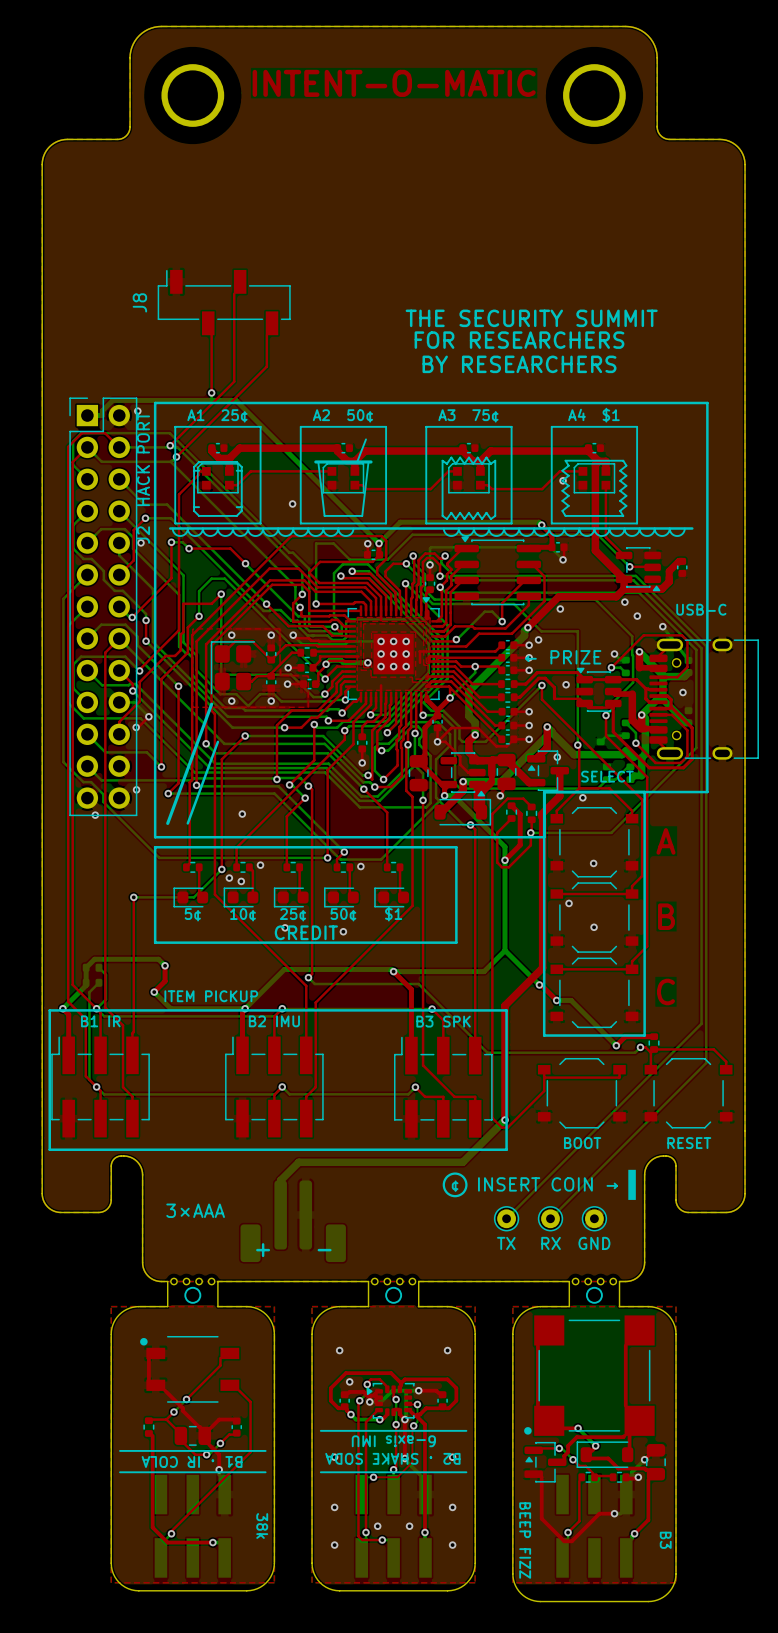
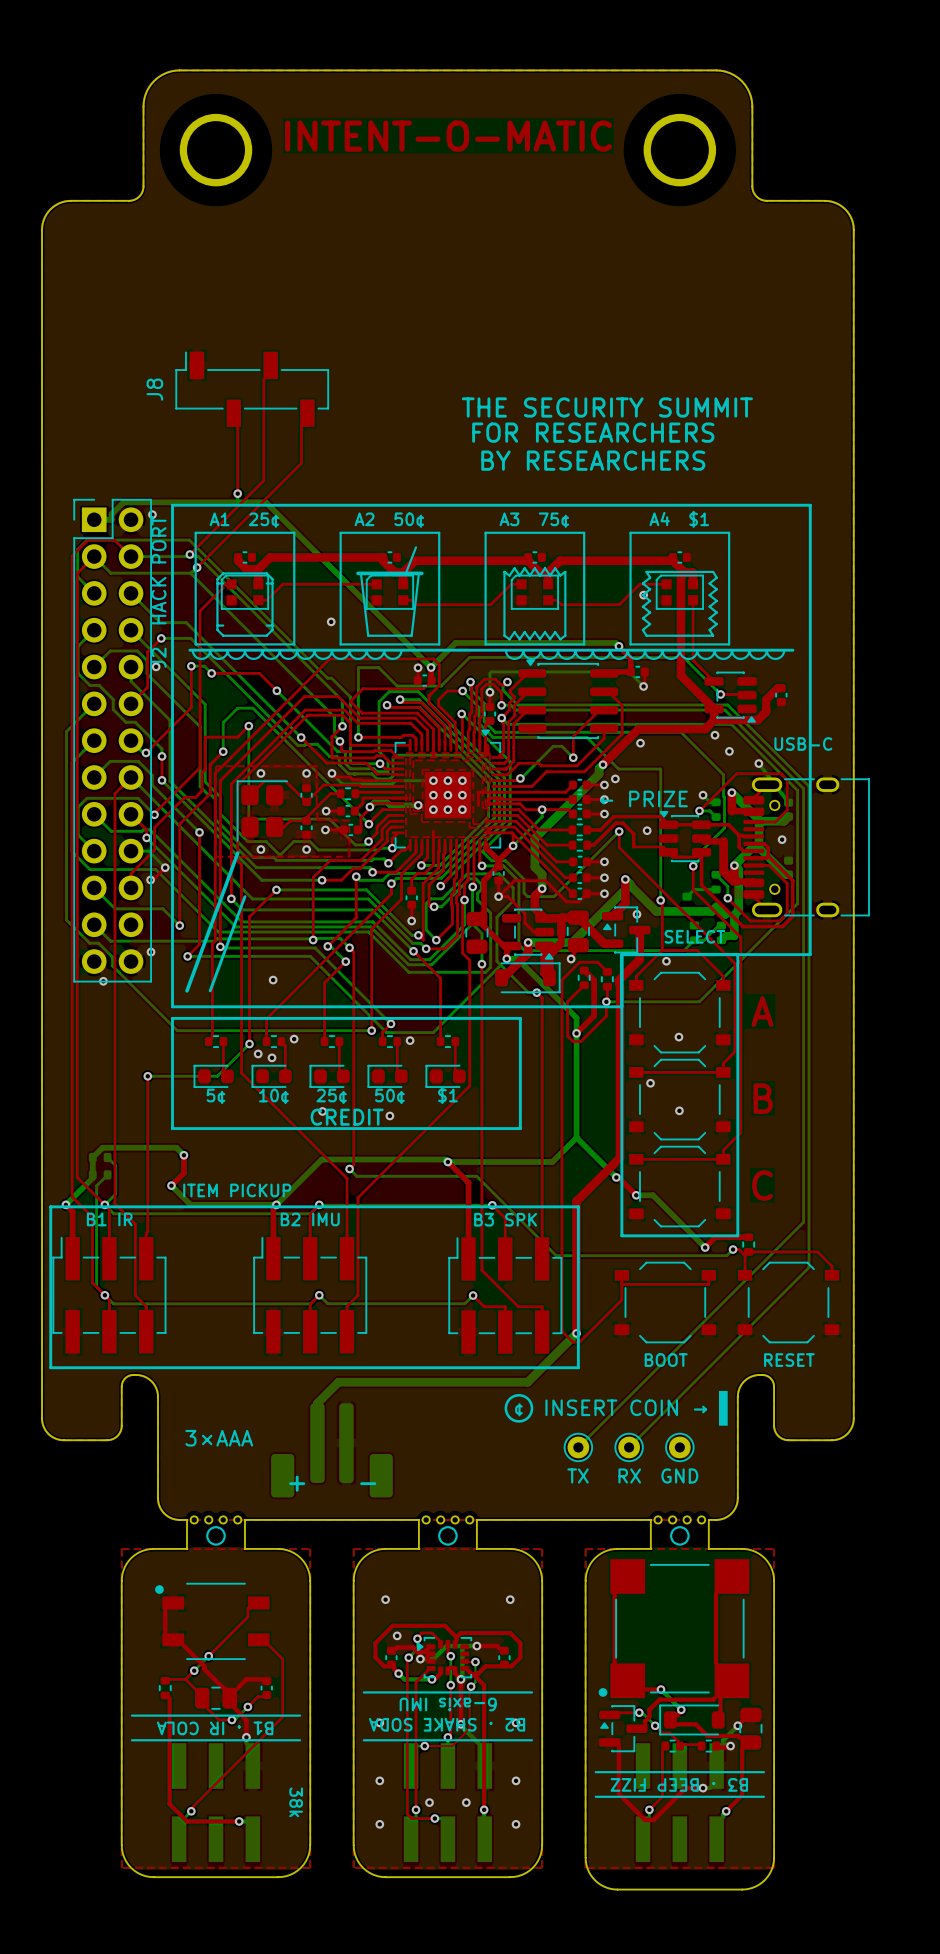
line: none -> (595, 1772) (763, 1772)
line: none -> (595, 1796) (763, 1796)
text: BEEP FIZZ (525, 1540) -> B3 · BEEP FIZZ (679, 1784)
text: B3 (665, 1540) -> none

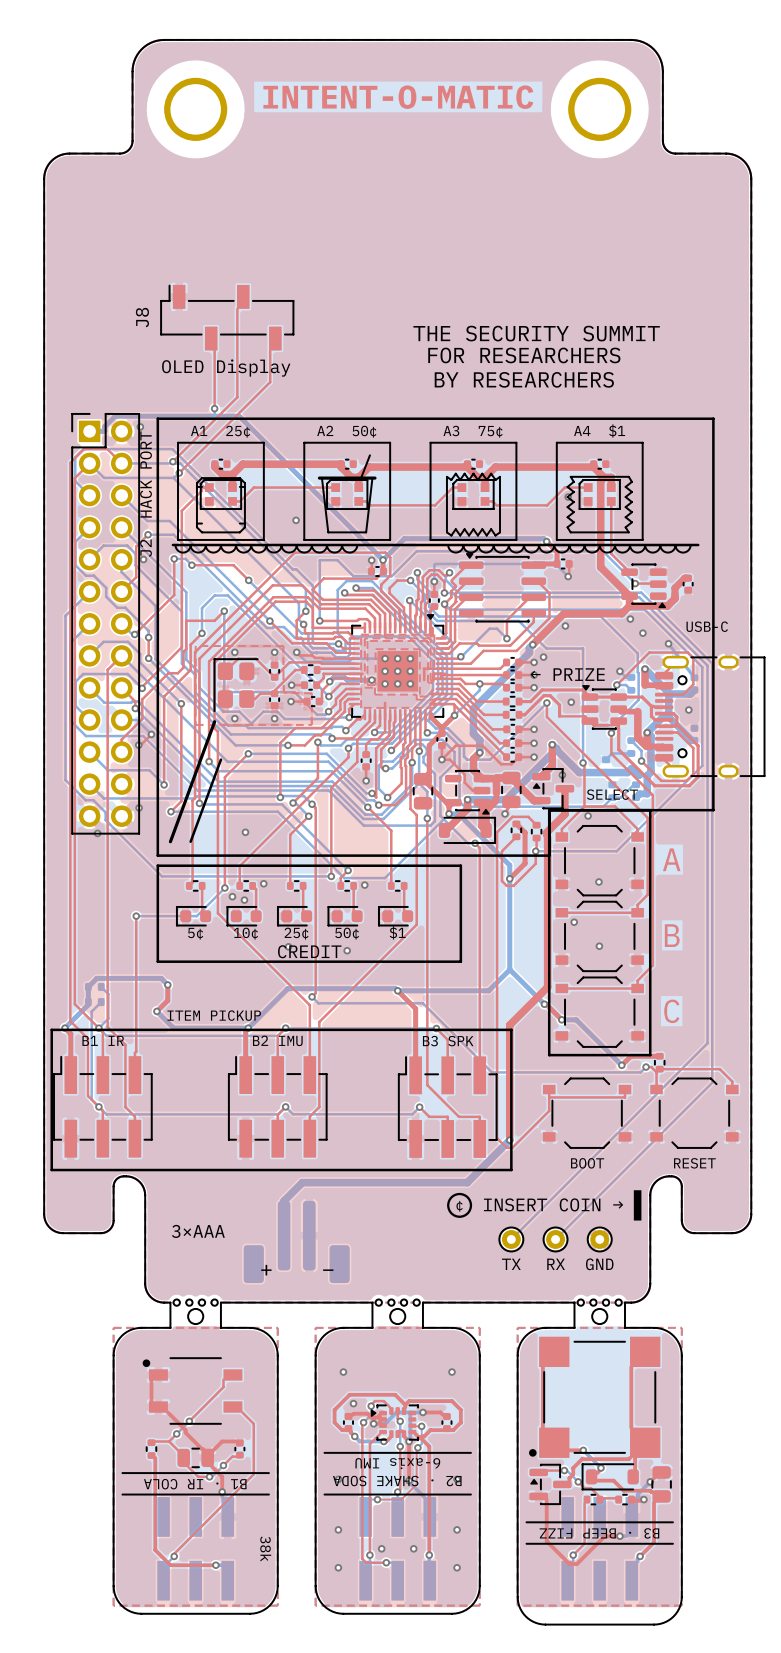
text: none -> OLED Display (226, 368)

